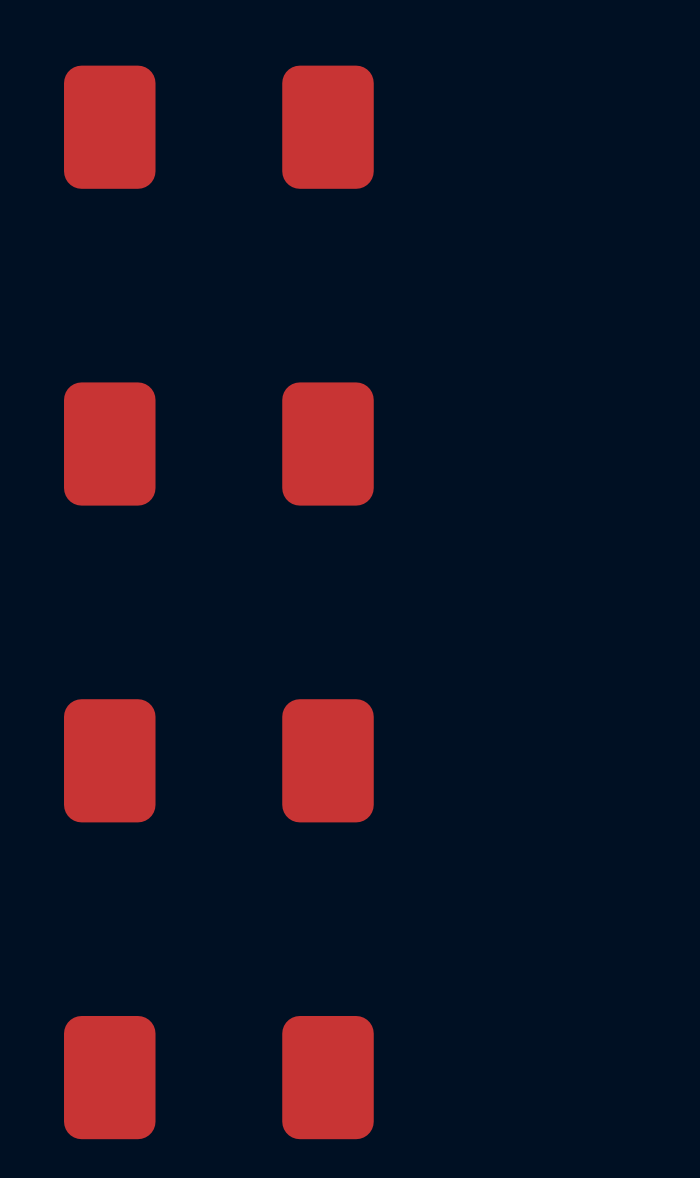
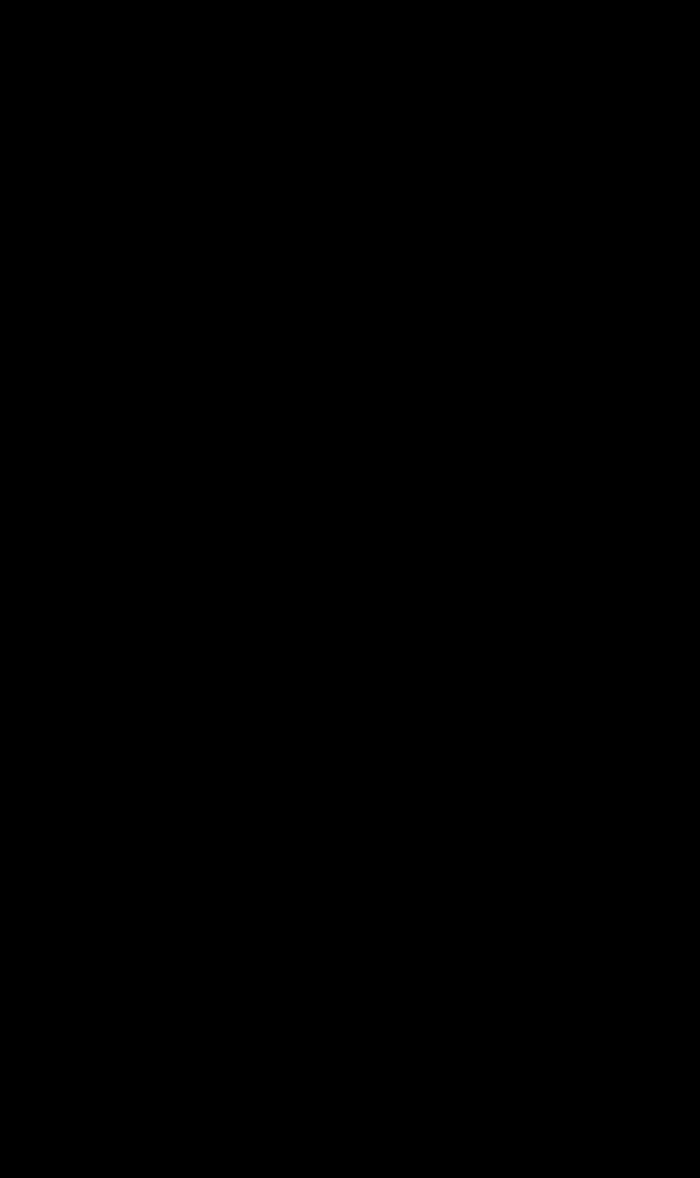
part: (218, 127) -> none
part: (218, 444) -> none
part: (218, 760) -> none
part: (218, 1077) -> none

